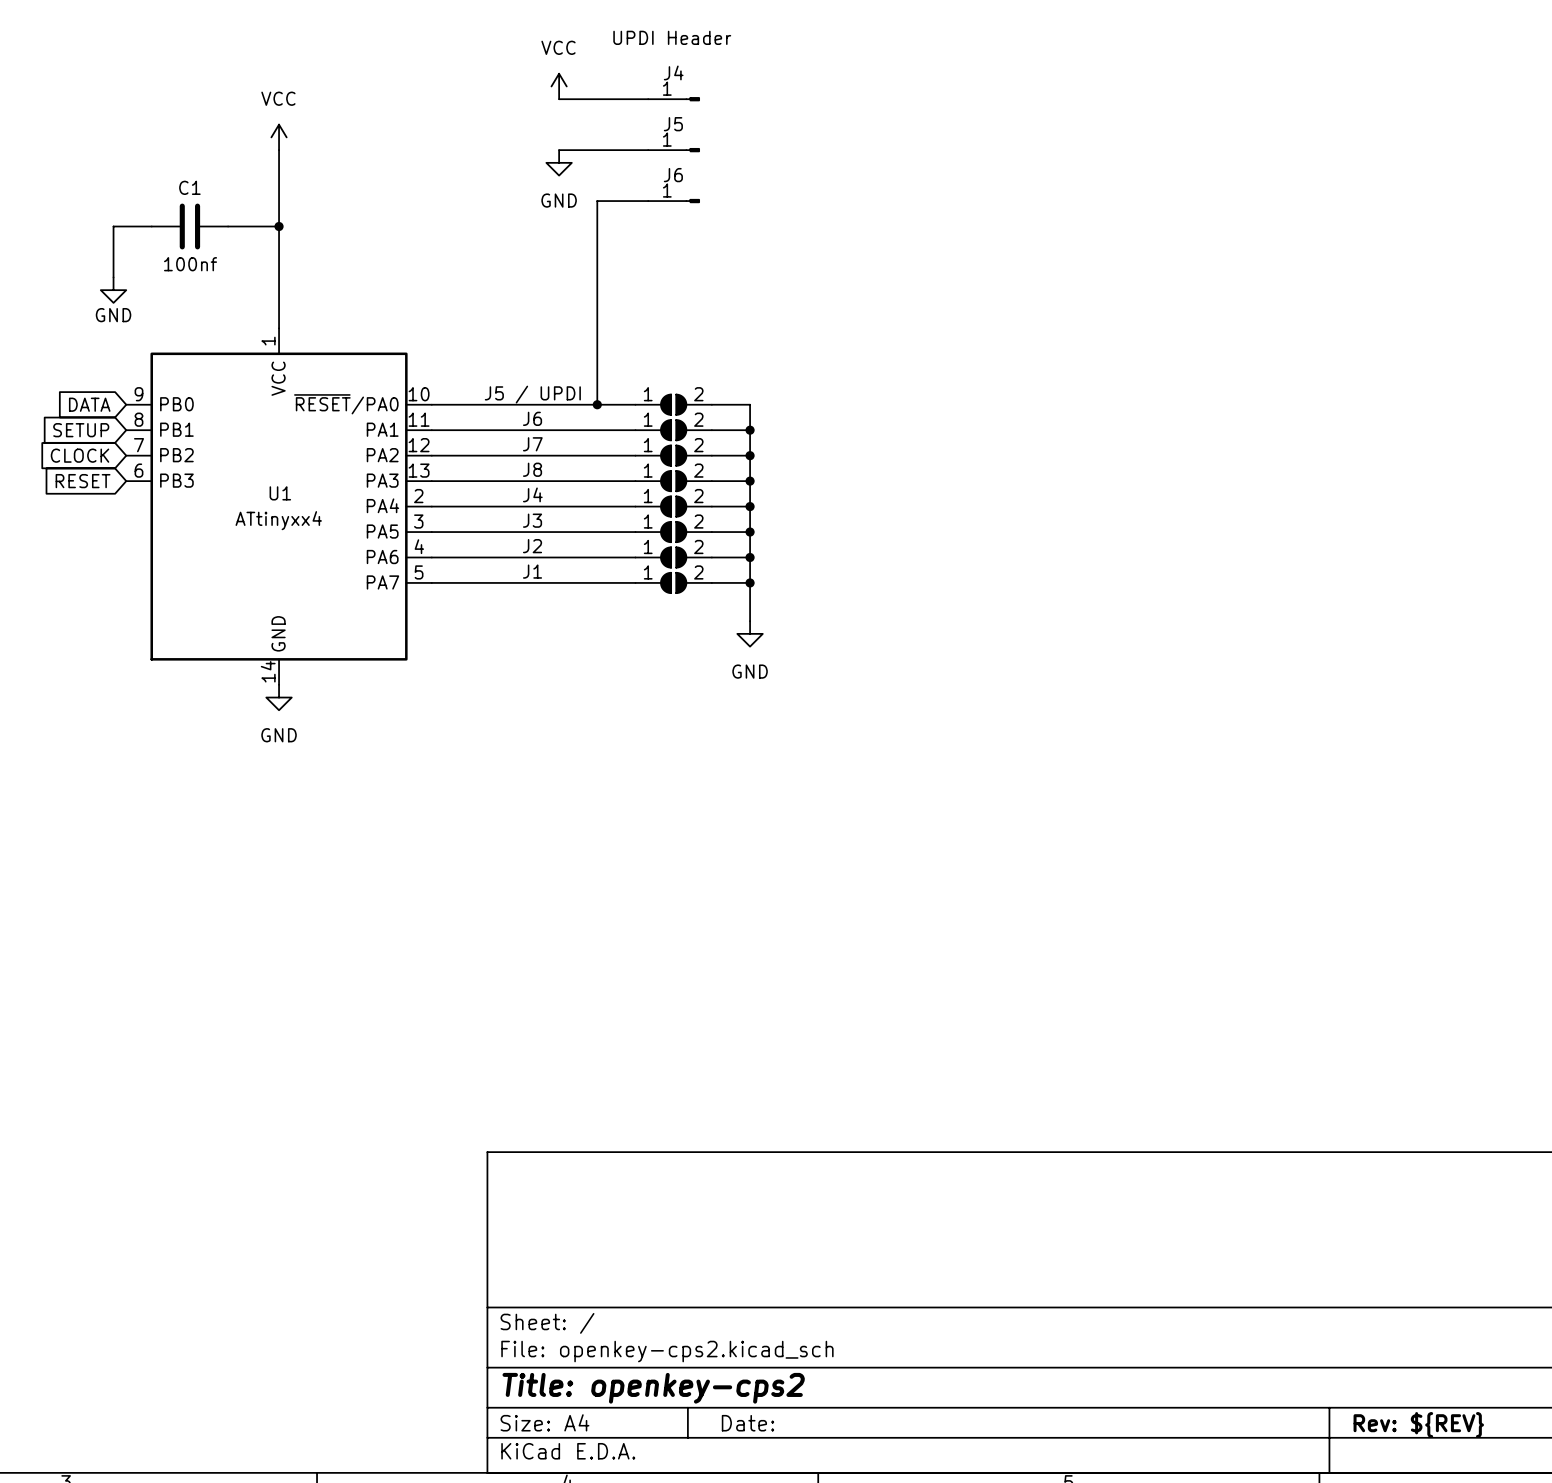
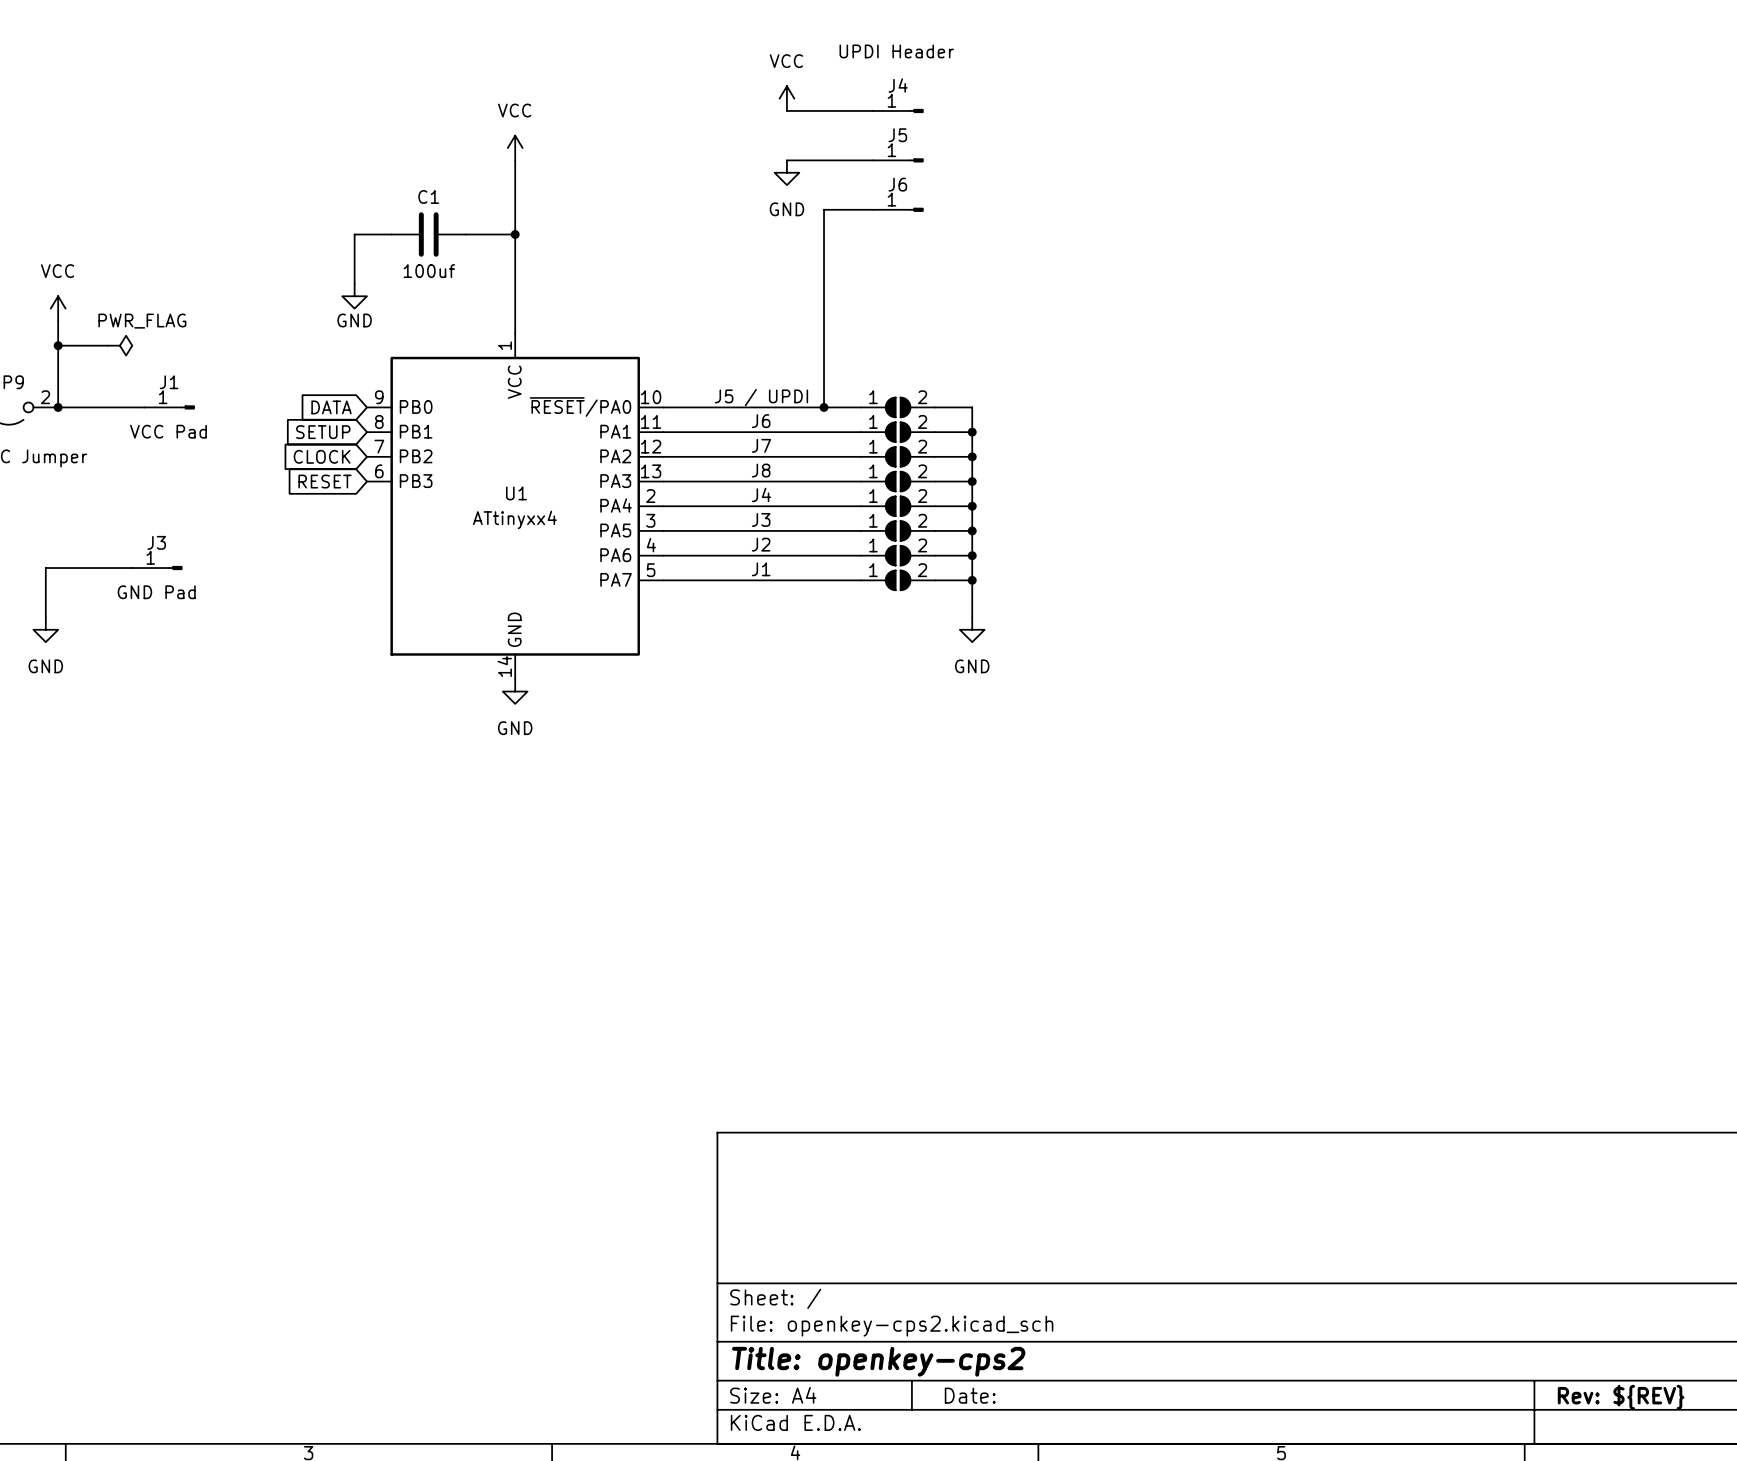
C1 value: 100nf (190, 264) -> 100uf (429, 271)

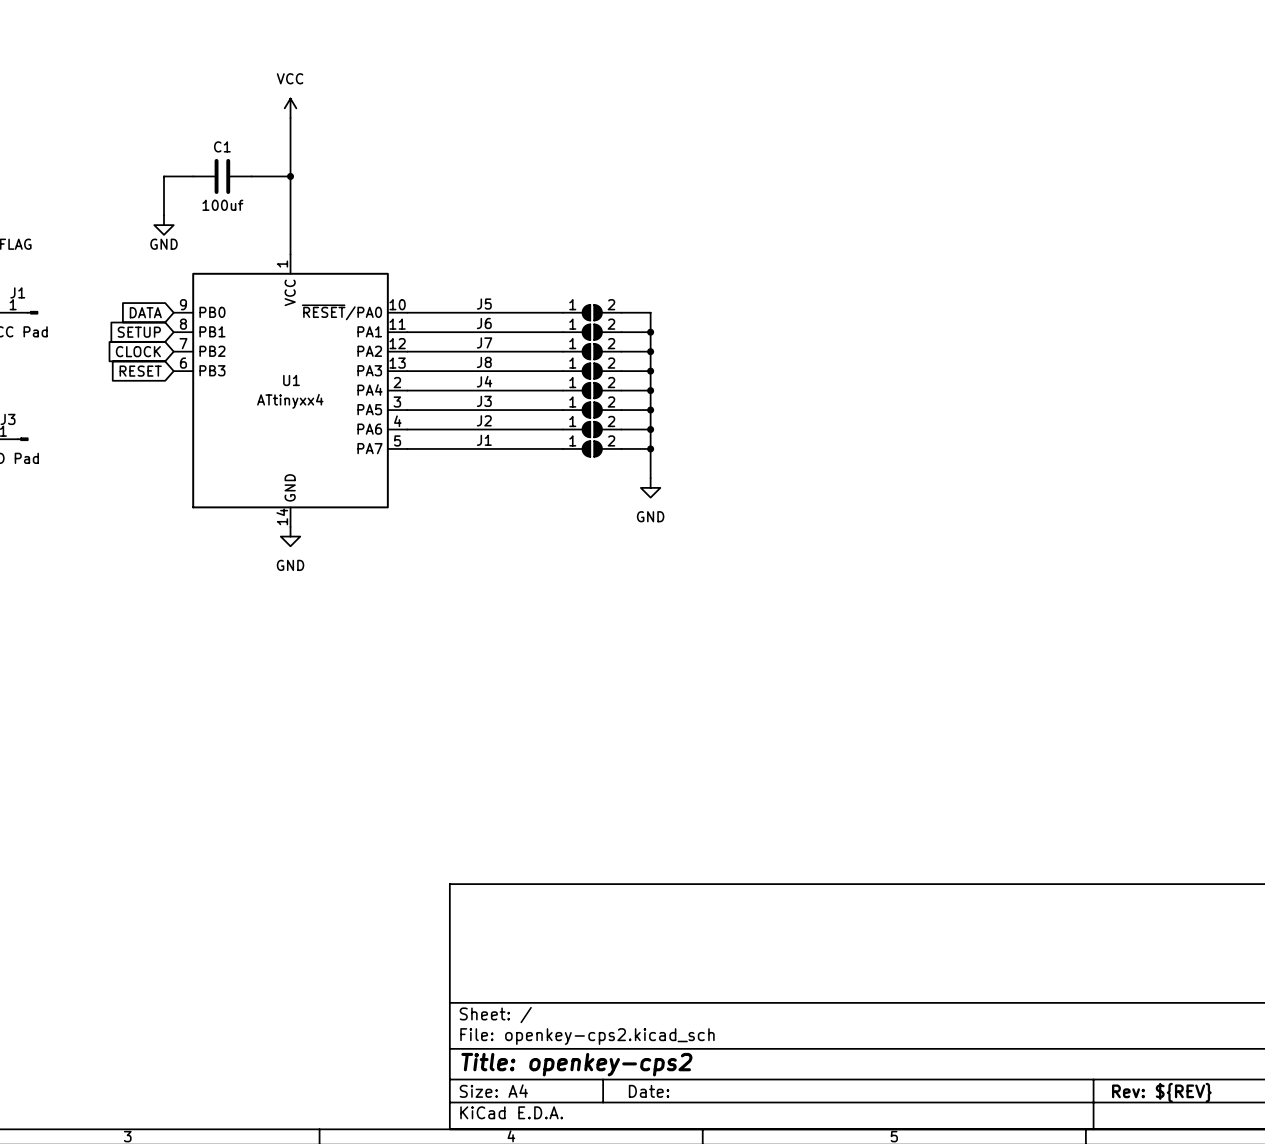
text: UPDI Header (896, 51) -> none
power symbol: VCC (786, 98) -> none
wire: (786, 110) (873, 110) -> none
J4: (898, 110) -> none
wire: (786, 160) (873, 160) -> none
J5: (898, 160) -> none
power symbol: GND (786, 172) -> none
wire: (873, 209) (824, 209) (824, 407) -> none
J6: (898, 209) -> none
label: none -> J5 (484, 304)
label: J5 / UPDI (761, 397) -> none
junction: (824, 407) -> none

